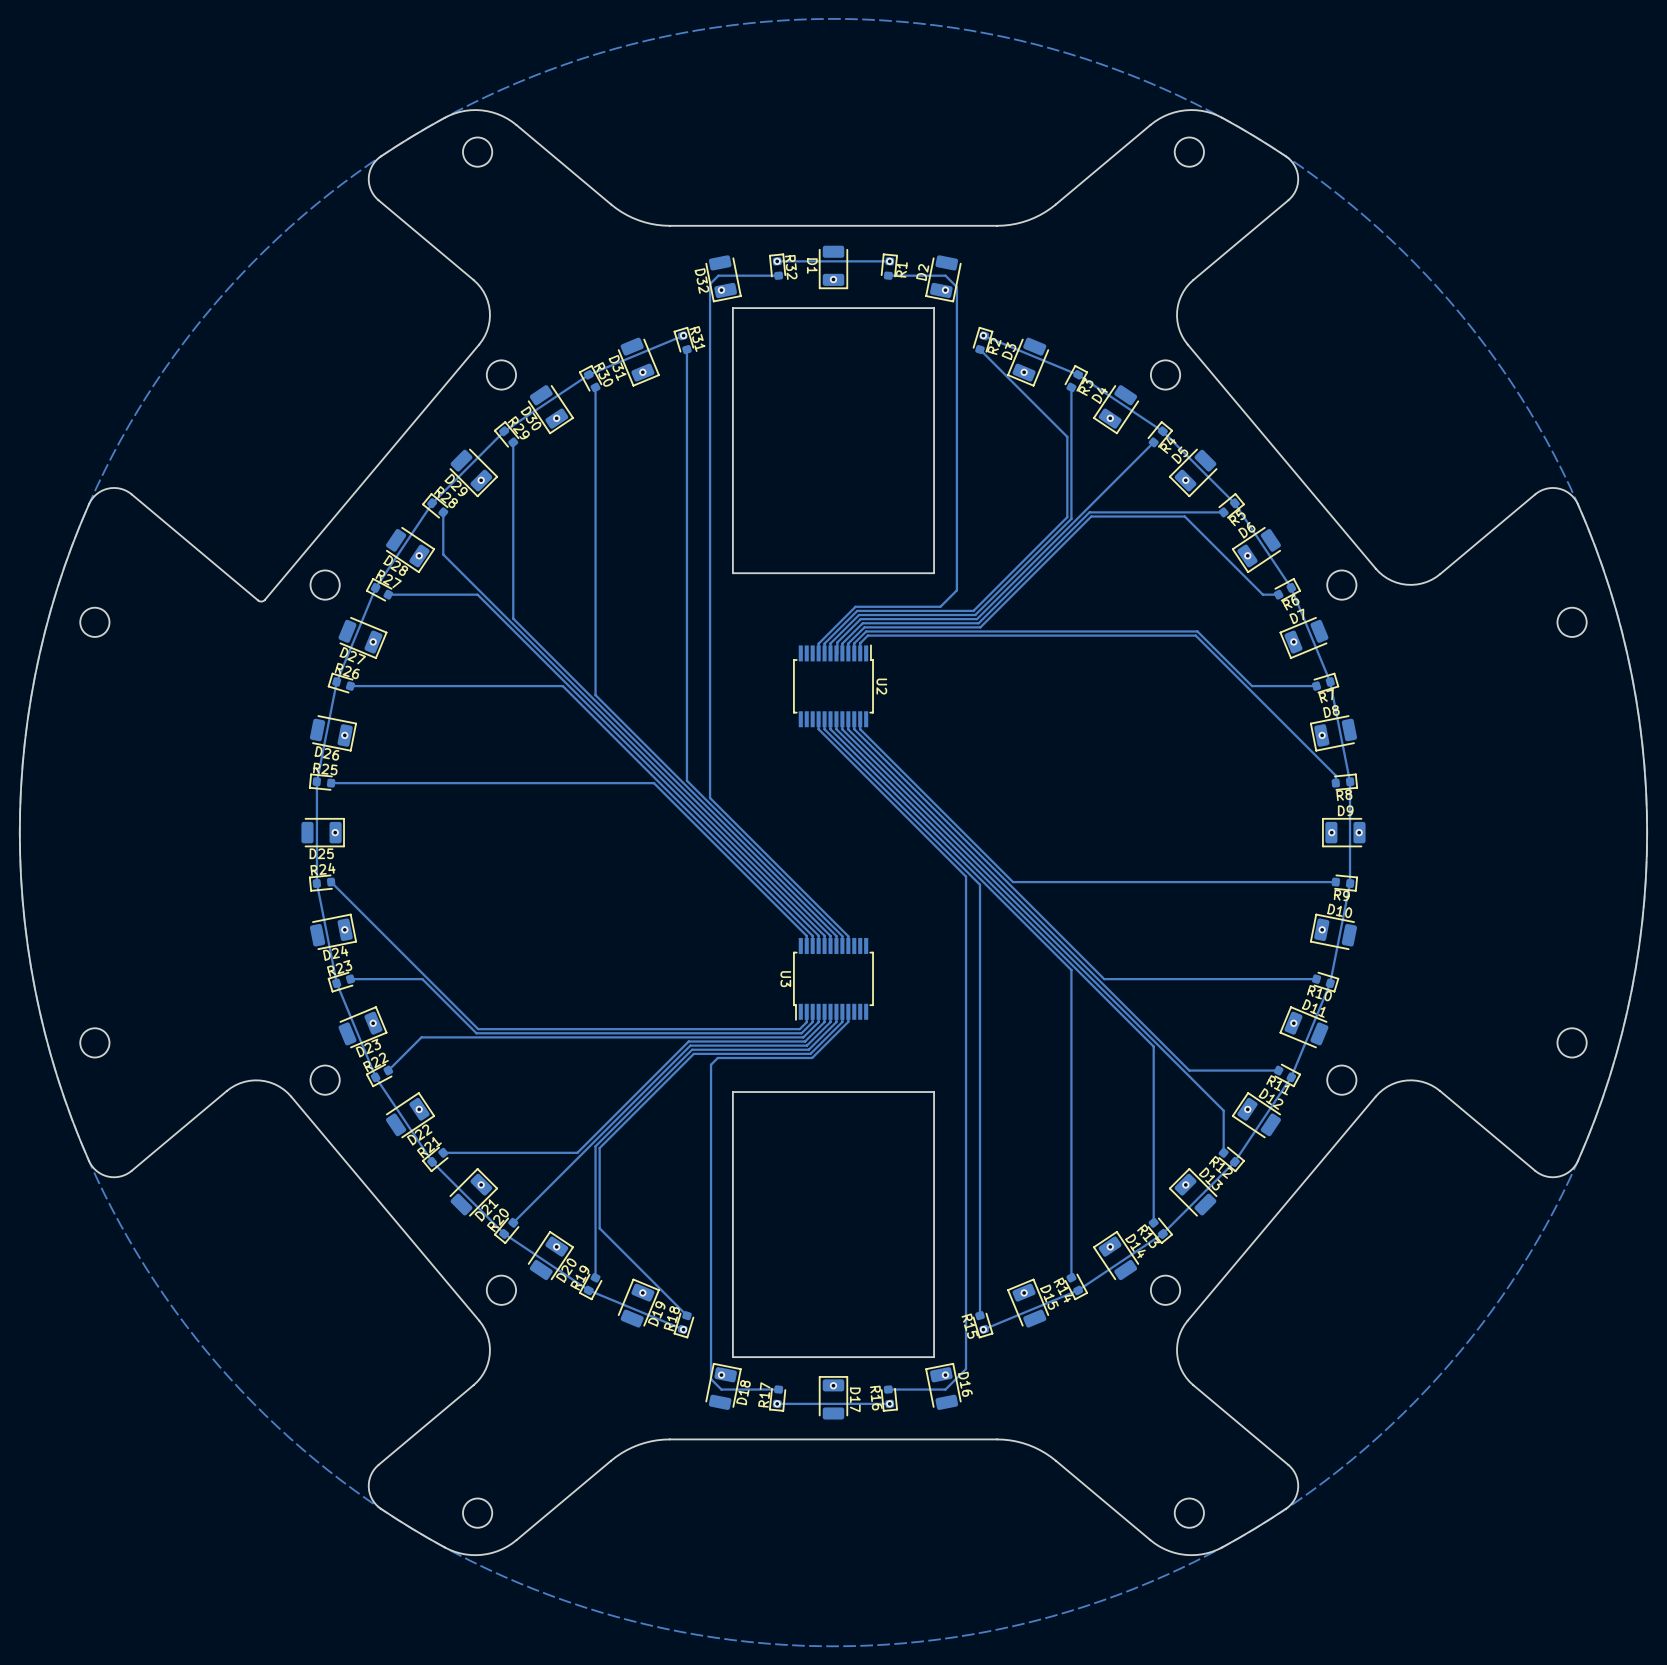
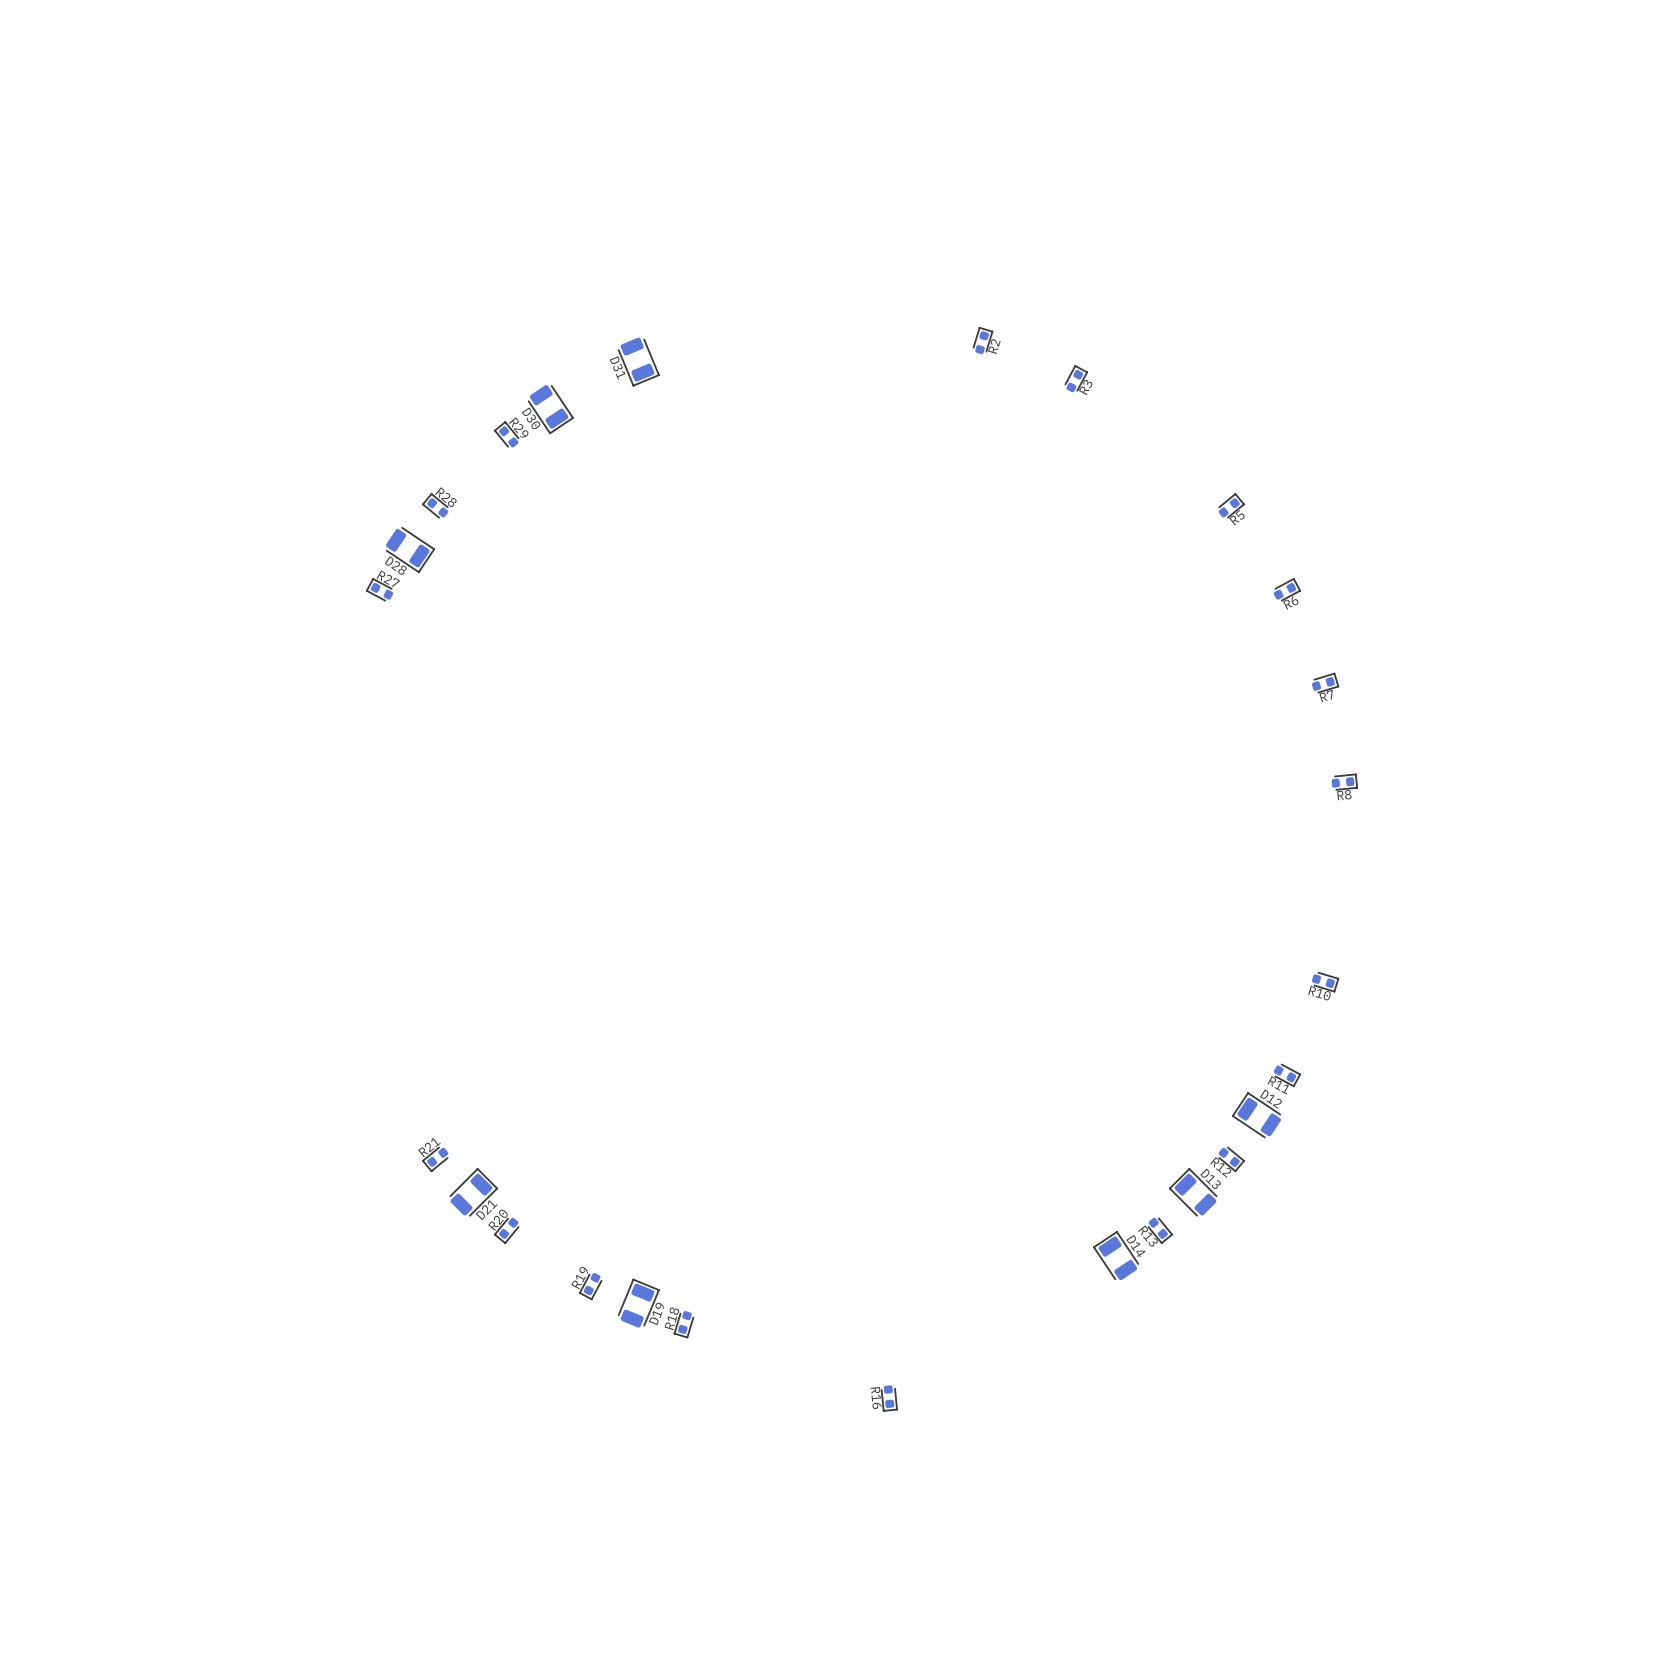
zone outline: (833, 18) (765, 21) (681, 33) (598, 53) (518, 82) (456, 111) (383, 154) (328, 194) (264, 251) (217, 300) (165, 368) (120, 440) (83, 517) (54, 597) (34, 680) (22, 764) (19, 832) (22, 900) (34, 985) (54, 1067) (83, 1147) (112, 1209) (155, 1282) (195, 1338) (252, 1401) (301, 1448) (369, 1500) (441, 1545) (518, 1582) (598, 1611) (681, 1631) (765, 1643) (833, 1646) (901, 1643) (985, 1631) (1068, 1611) (1148, 1582) (1225, 1545) (1297, 1500) (1365, 1448) (1414, 1401) (1471, 1338) (1511, 1282) (1554, 1209) (1583, 1147) (1612, 1067) (1632, 985) (1644, 900) (1647, 832) (1644, 764) (1632, 680) (1612, 597) (1583, 517) (1554, 455) (1511, 382) (1471, 327) (1414, 263) (1365, 216) (1297, 164) (1225, 119) (1148, 82) (1068, 53) (985, 33) (901, 21) (833, 18) -> none
board edge: (1222, 117) (1206, 111) (1190, 110) (1164, 116) (1150, 125) (1050, 208) (1034, 217) (1016, 223) (997, 225) (669, 225) (644, 222) (621, 211) (516, 125) (502, 116) (476, 110) (454, 113) (428, 126) (378, 158) (370, 168) (369, 184) (372, 192) (378, 200) (480, 287) (485, 296) (489, 311) (487, 331) (479, 344) (265, 599) (258, 600) (126, 490) (114, 487) (104, 489) (96, 494) (90, 501) (64, 567) (44, 631) (31, 698) (21, 787) (21, 877) (27, 944) (39, 1011) (64, 1098) (90, 1163) (101, 1174) (114, 1177) (123, 1175) (131, 1170) (235, 1085) (249, 1080) (265, 1081) (279, 1086) (291, 1096) (479, 1320) (487, 1333) (489, 1354) (487, 1364) (480, 1377) (378, 1464) (372, 1472) (369, 1481) (370, 1496) (378, 1506) (444, 1547) (470, 1555) (487, 1554) (502, 1549) (516, 1540) (616, 1456) (632, 1447) (650, 1441) (669, 1439) (997, 1439) (1022, 1442) (1045, 1453) (1150, 1540) (1164, 1549) (1190, 1555) (1212, 1551) (1238, 1538) (1288, 1506) (1297, 1493) (1297, 1481) (1294, 1472) (1288, 1464) (1186, 1377) (1179, 1364) (1177, 1354) (1179, 1333) (1187, 1320) (1375, 1096) (1383, 1089) (1396, 1082) (1411, 1080) (1426, 1083) (1440, 1091) (1540, 1174) (1552, 1177) (1562, 1175) (1570, 1170) (1576, 1163) (1602, 1098) (1622, 1033) (1635, 967) (1645, 877) (1646, 810) (1639, 720) (1627, 653) (1602, 567) (1576, 501) (1565, 490) (1552, 487) (1543, 489) (1535, 494) (1431, 579) (1416, 584) (1401, 583) (1387, 578) (1375, 568) (1187, 344) (1179, 331) (1177, 321) (1177, 306) (1186, 287) (1288, 200) (1294, 192) (1297, 184) (1297, 171) (1288, 158) (1222, 117) -> none
round board edge: [462, 136, 494, 168] -> none
round board edge: [1173, 136, 1205, 168] -> none
via: (777, 261) -> none
track: (889, 261) (777, 261) -> none
via: (889, 261) -> none
R32: (777, 266) -> none
R1: (889, 266) -> none
D1: (833, 267) -> none
track: (778, 275) (718, 275) (710, 284) (710, 798) (848, 936) (848, 945) -> none
track: (888, 275) (945, 275) (956, 287) (956, 590) (940, 606) (855, 606) (818, 643) (818, 653) -> none
D32: (723, 278) -> none
D2: (943, 278) -> none
via: (833, 279) -> none
via: (721, 290) -> none
via: (945, 290) -> none
board edge: (934, 308) (934, 573) (732, 573) (732, 308) (934, 308) -> none
track: (683, 335) (588, 375) -> none
via: (683, 335) -> none
track: (983, 335) (1078, 375) -> none
via: (983, 335) -> none
R31: (683, 340) -> none
track: (686, 349) (686, 780) (842, 936) (842, 945) -> none
track: (980, 349) (1067, 436) (1067, 517) (973, 610) (857, 610) (824, 643) (824, 653) -> none
round board edge: [485, 359, 517, 391] -> none
round board edge: [1149, 359, 1182, 391] -> none
D3: (1028, 361) -> none
via: (642, 372) -> none
via: (1024, 372) -> none
track: (589, 374) (503, 431) -> none
track: (1077, 374) (1163, 431) -> none
R30: (590, 378) -> none
track: (595, 387) (595, 695) (836, 936) (836, 945) -> none
track: (1071, 387) (1071, 518) (975, 615) (858, 615) (830, 643) (830, 653) -> none
D4: (1116, 409) -> none
via: (556, 418) -> none
via: (1110, 418) -> none
track: (504, 430) (431, 503) -> none
track: (1162, 430) (1235, 503) -> none
R4: (1160, 434) -> none
track: (513, 442) (513, 618) (830, 935) (830, 945) -> none
track: (1153, 442) (976, 619) (860, 619) (837, 642) (836, 653) -> none
D29: (473, 472) -> none
D5: (1193, 472) -> none
via: (481, 480) -> none
via: (1185, 480) -> none
track: (432, 502) (375, 588) -> none
track: (1234, 502) (1291, 588) -> none
track: (443, 512) (443, 554) (824, 935) (824, 945) -> none
track: (1223, 512) (1089, 512) (978, 623) (862, 623) (842, 643) (842, 653) -> none
D6: (1256, 549) -> none
via: (419, 555) -> none
via: (1247, 555) -> none
round board edge: [309, 569, 341, 601] -> none
round board edge: [1326, 569, 1358, 601] -> none
track: (376, 587) (336, 682) -> none
track: (1290, 587) (1330, 682) -> none
track: (388, 594) (477, 594) (818, 935) (818, 945) -> none
track: (1278, 594) (1262, 594) (1184, 516) (1091, 516) (980, 627) (864, 627) (848, 643) (848, 653) -> none
round board edge: [79, 606, 111, 638] -> none
round board edge: [1556, 606, 1588, 638] -> none
D27: (362, 637) -> none
D7: (1304, 637) -> none
via: (373, 641) -> none
via: (1293, 641) -> none
track: (854, 653) (854, 643) (866, 631) (1197, 631) (1252, 686) (1316, 686) -> none
track: (860, 653) (860, 643) (867, 635) (1195, 635) (1335, 775) (1335, 783) -> none
track: (336, 681) (316, 782) -> none
track: (1330, 681) (1350, 782) -> none
R26: (341, 683) -> none
U2: (833, 685) -> none
track: (350, 686) (562, 686) (812, 935) (812, 945) -> none
track: (818, 719) (818, 729) (966, 876) (966, 1369) (945, 1389) (888, 1389) -> none
track: (824, 719) (824, 729) (980, 884) (980, 1315) -> none
track: (830, 719) (830, 729) (1071, 970) (1071, 1277) -> none
track: (836, 719) (836, 729) (1153, 1046) (1153, 1222) -> none
track: (842, 719) (842, 729) (1223, 1110) (1223, 1152) -> none
track: (848, 719) (848, 729) (1189, 1070) (1278, 1070) -> none
track: (854, 719) (854, 729) (1104, 979) (1316, 979) -> none
track: (860, 719) (860, 729) (1013, 882) (1335, 882) -> none
D26: (333, 733) -> none
D8: (1333, 733) -> none
via: (344, 735) -> none
via: (1322, 735) -> none
track: (316, 780) (316, 884) -> none
track: (1350, 780) (1350, 884) -> none
R25: (322, 782) -> none
track: (331, 783) (653, 783) (806, 935) (806, 945) -> none
D25: (322, 832) -> none
via: (335, 832) -> none
via: (1331, 832) -> none
D9: (1343, 832) -> none
via: (1359, 832) -> none
track: (316, 882) (336, 984) -> none
track: (331, 882) (478, 1029) (799, 1029) (806, 1022) (806, 1011) -> none
track: (1350, 882) (1330, 984) -> none
R24: (322, 883) -> none
R9: (1344, 883) -> none
via: (344, 929) -> none
via: (1322, 929) -> none
D24: (333, 931) -> none
D10: (1333, 931) -> none
track: (350, 979) (422, 979) (476, 1033) (801, 1033) (812, 1022) (812, 1011) -> none
U3: (833, 979) -> none
track: (336, 982) (376, 1078) -> none
R23: (341, 982) -> none
track: (1330, 982) (1290, 1078) -> none
track: (818, 1011) (818, 1022) (803, 1037) (421, 1037) (388, 1070) -> none
track: (824, 1011) (824, 1022) (805, 1041) (688, 1041) (577, 1152) (443, 1152) -> none
track: (830, 1011) (830, 1022) (806, 1045) (690, 1045) (513, 1222) -> none
track: (836, 1011) (836, 1022) (808, 1049) (692, 1049) (595, 1146) (595, 1277) -> none
track: (842, 1011) (842, 1021) (810, 1053) (693, 1053) (599, 1148) (599, 1228) (686, 1315) -> none
track: (848, 1011) (848, 1021) (812, 1057) (717, 1057) (711, 1064) (711, 1379) (721, 1389) (778, 1389) -> none
via: (373, 1023) -> none
via: (1293, 1023) -> none
round board edge: [79, 1027, 111, 1059] -> none
D23: (362, 1027) -> none
D11: (1304, 1027) -> none
round board edge: [1556, 1027, 1588, 1059] -> none
round board edge: [309, 1064, 341, 1096] -> none
round board edge: [1326, 1064, 1358, 1096] -> none
R22: (379, 1075) -> none
track: (375, 1076) (432, 1162) -> none
track: (1291, 1076) (1234, 1162) -> none
board edge: (934, 1092) (732, 1092) (732, 1357) (934, 1357) (934, 1092) -> none
via: (419, 1109) -> none
via: (1247, 1109) -> none
D22: (410, 1115) -> none
track: (431, 1161) (504, 1234) -> none
track: (1235, 1161) (1162, 1234) -> none
via: (481, 1184) -> none
via: (1185, 1184) -> none
track: (503, 1233) (589, 1290) -> none
track: (1163, 1233) (1077, 1290) -> none
via: (556, 1246) -> none
via: (1110, 1246) -> none
D20: (550, 1255) -> none
round board edge: [485, 1274, 517, 1306] -> none
round board edge: [1149, 1274, 1182, 1306] -> none
R14: (1076, 1286) -> none
track: (588, 1290) (683, 1329) -> none
track: (1078, 1290) (983, 1329) -> none
via: (642, 1292) -> none
via: (1024, 1292) -> none
D15: (1028, 1303) -> none
R15: (983, 1324) -> none
via: (683, 1329) -> none
via: (983, 1329) -> none
via: (721, 1375) -> none
via: (945, 1375) -> none
via: (833, 1385) -> none
D18: (723, 1386) -> none
D16: (943, 1386) -> none
D17: (833, 1397) -> none
R17: (777, 1398) -> none
via: (777, 1403) -> none
track: (889, 1403) (777, 1403) -> none
via: (889, 1403) -> none
round board edge: [462, 1497, 494, 1529] -> none
round board edge: [1173, 1497, 1205, 1529] -> none

